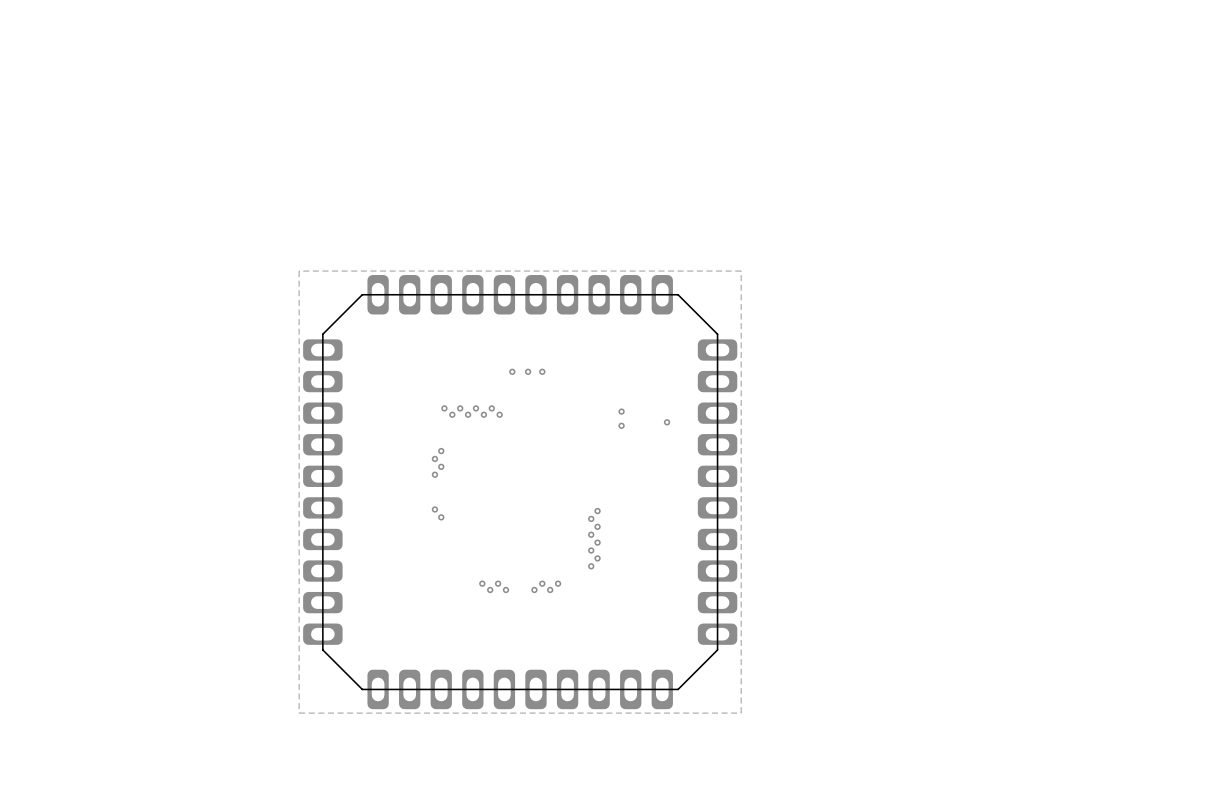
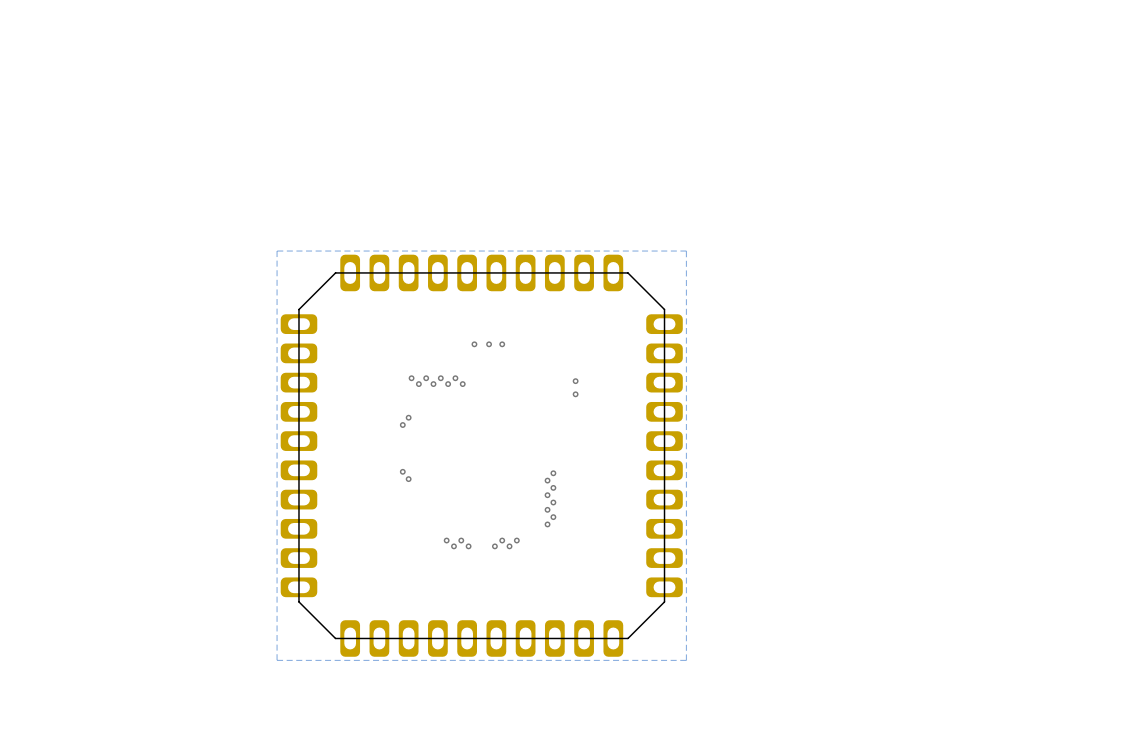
via: (667, 422) -> none
via: (441, 466) -> none
via: (434, 474) -> none

